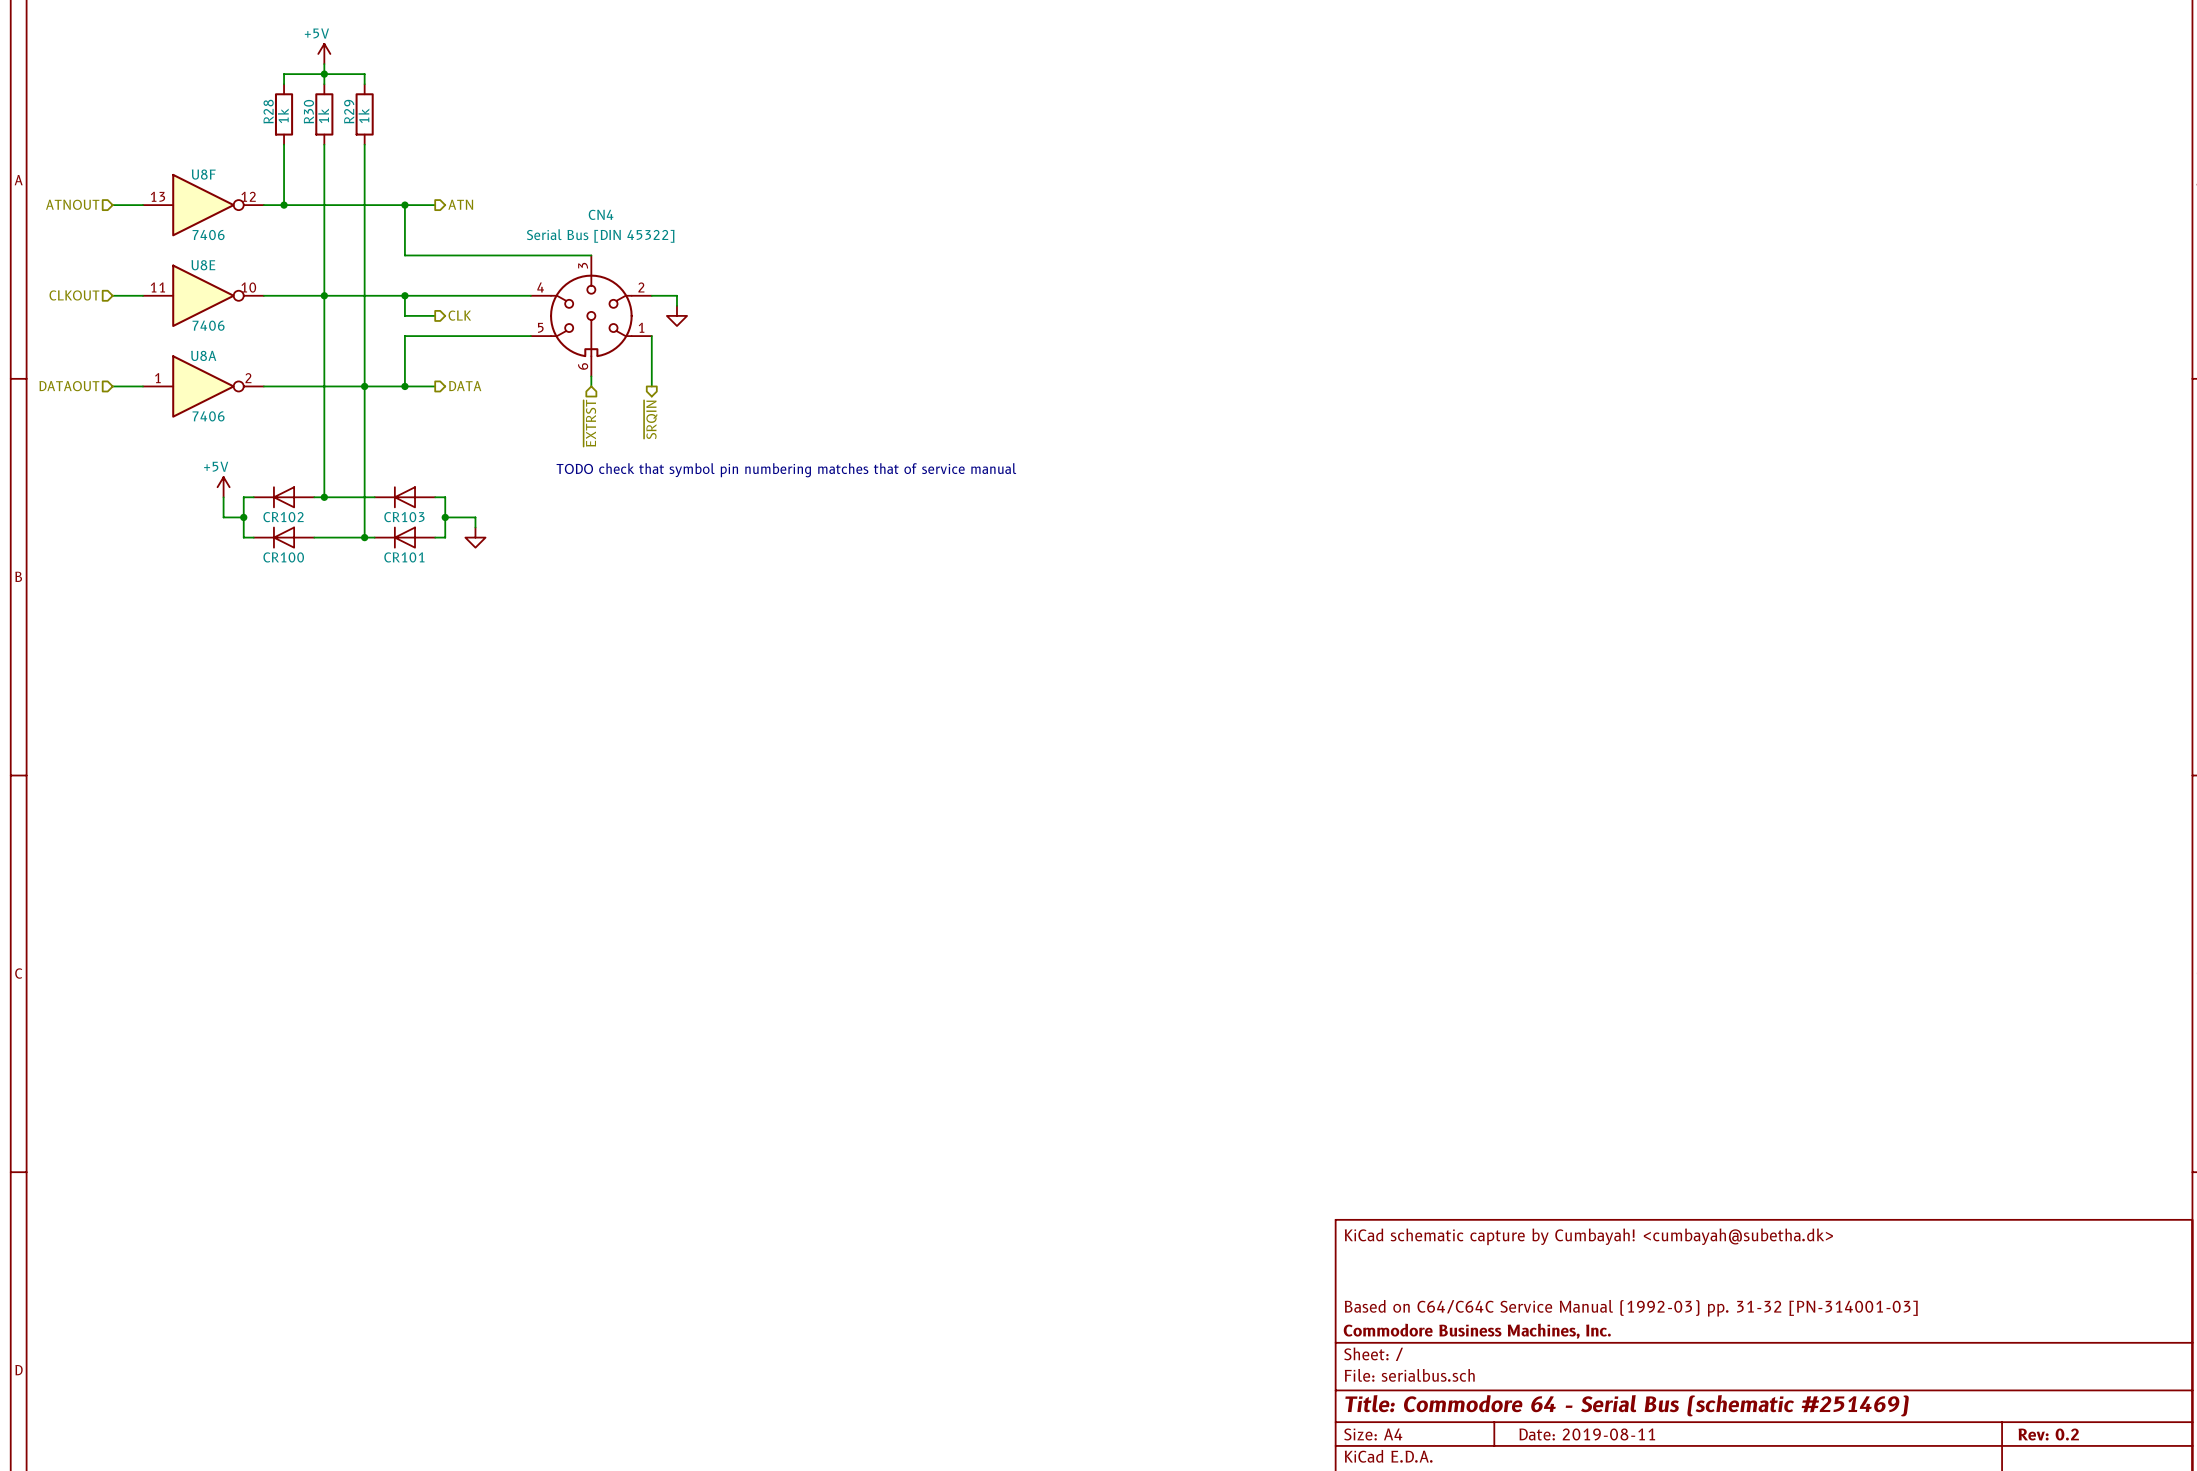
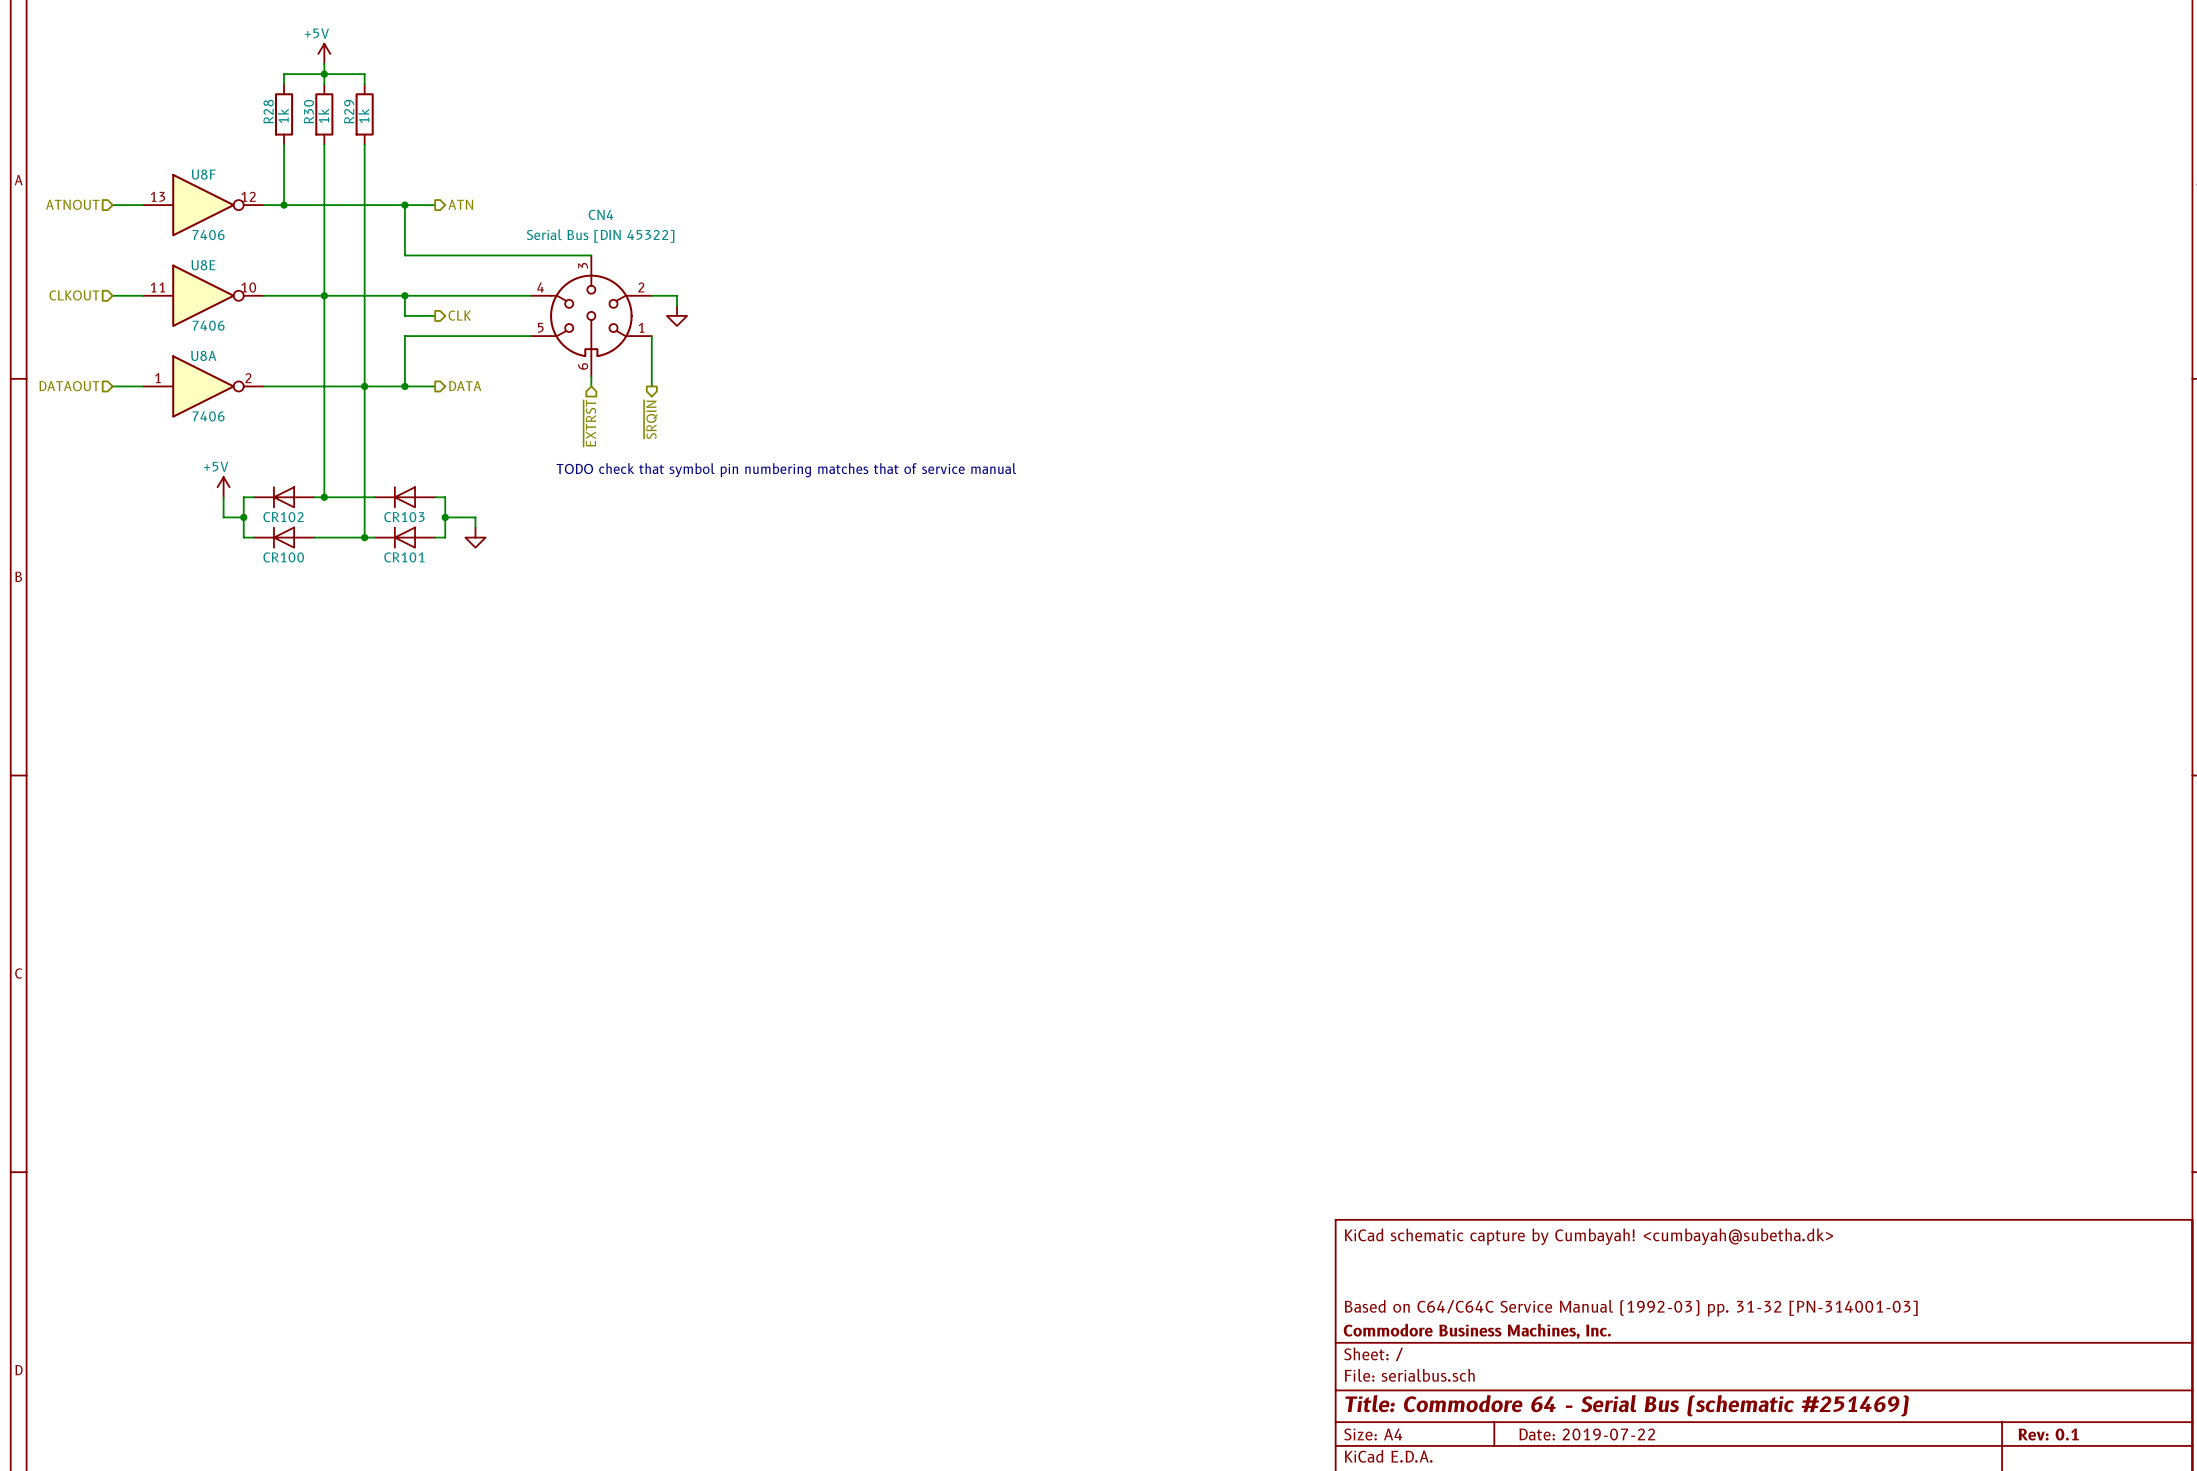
title block: Date: 2019-08-11 (1587, 1434) -> Date: 2019-07-22 (1587, 1434)
title block: Rev: 0.2 (2048, 1434) -> Rev: 0.1 (2048, 1434)

